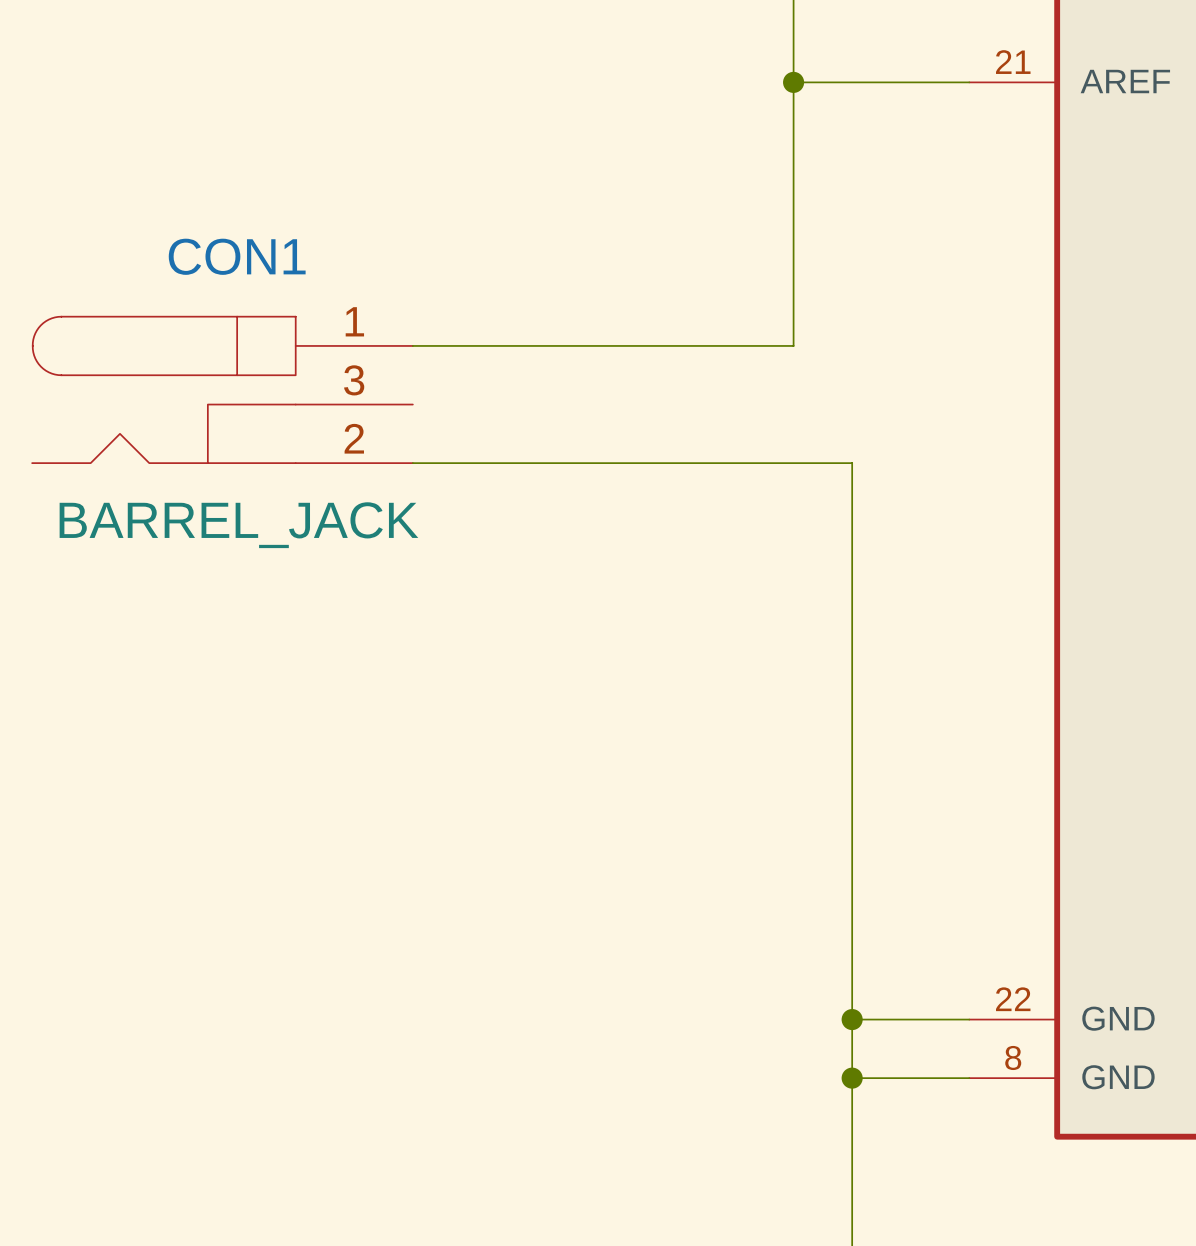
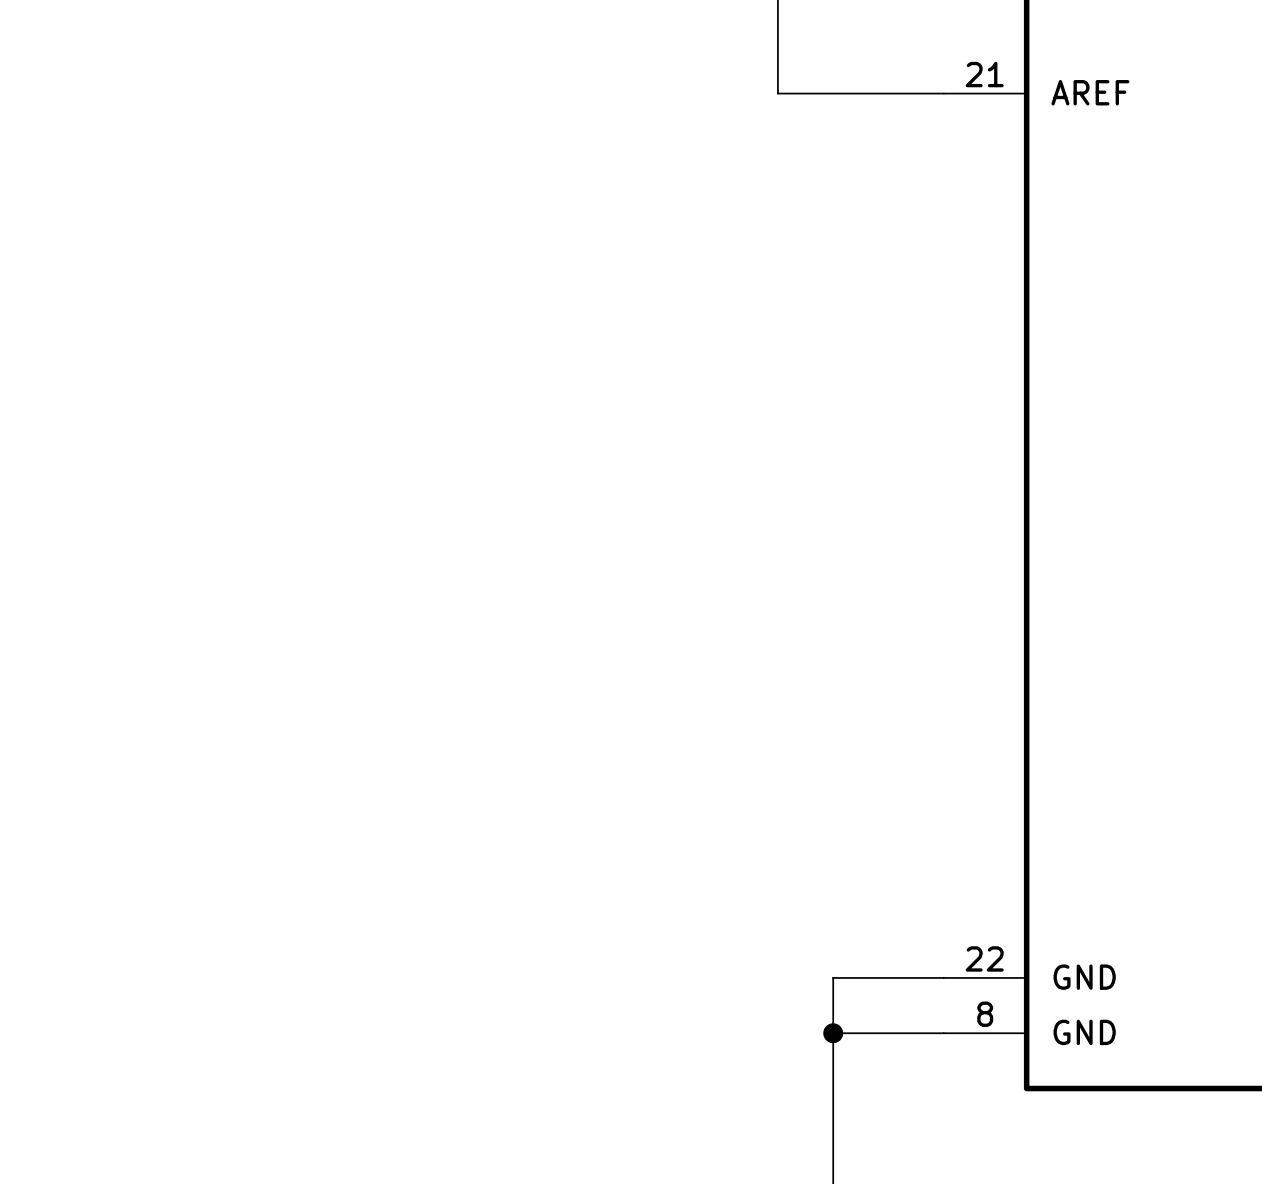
wire: (793, 82) (793, 345) (412, 345) -> none
junction: (793, 82) -> none
CON1: BARREL_JACK (222, 389) -> none
wire: (412, 463) (852, 463) (852, 1019) -> none
junction: (852, 1019) -> none

